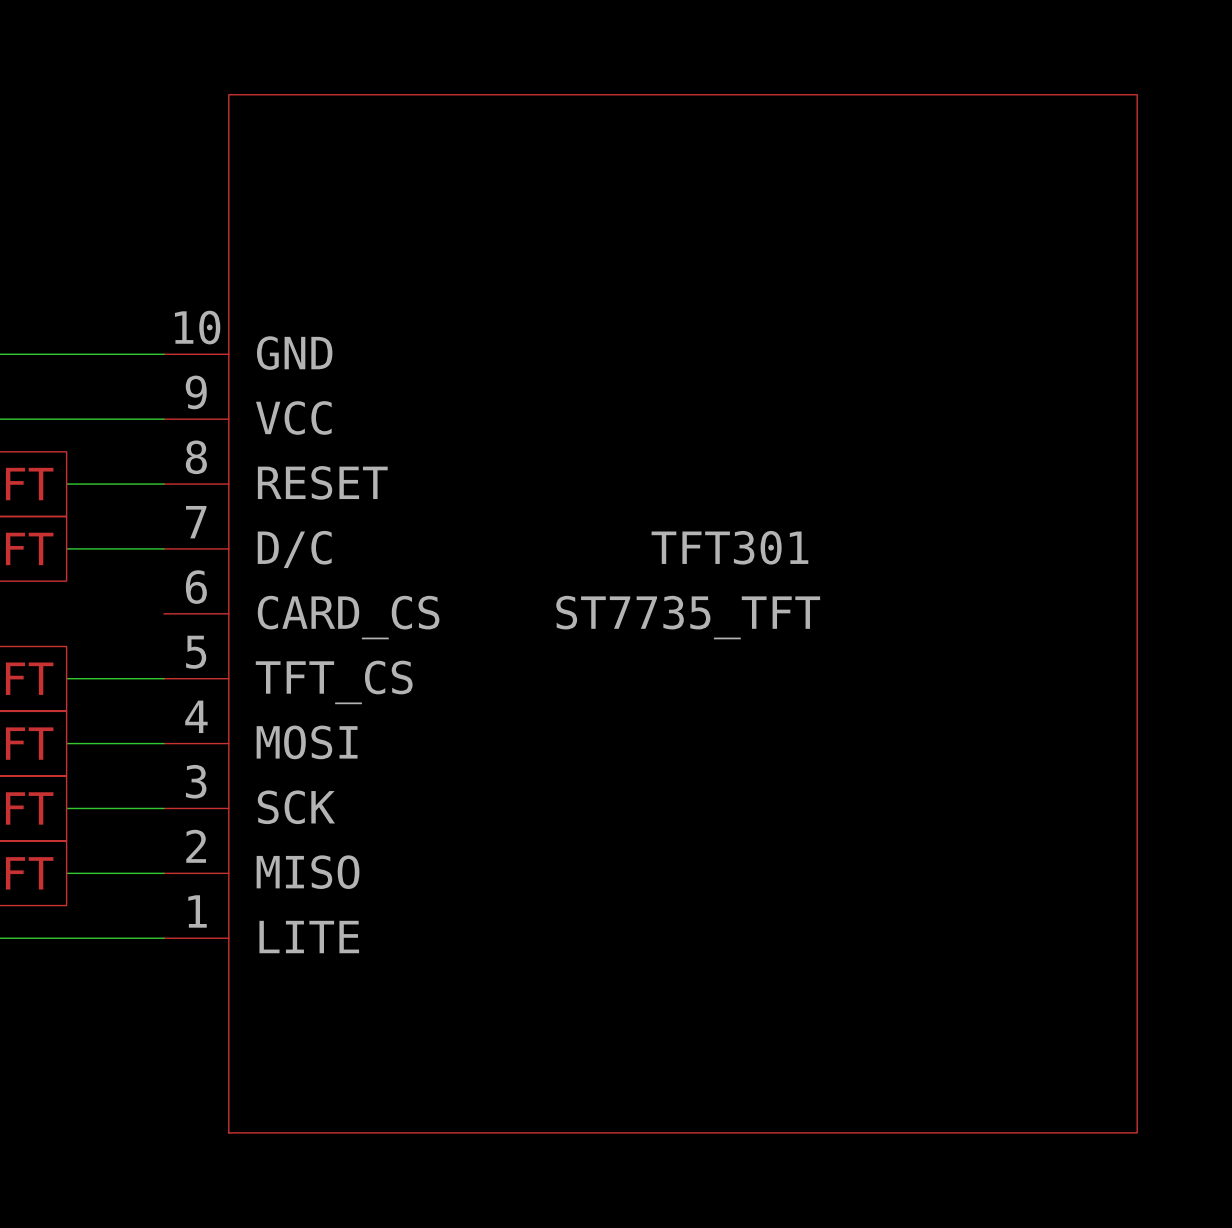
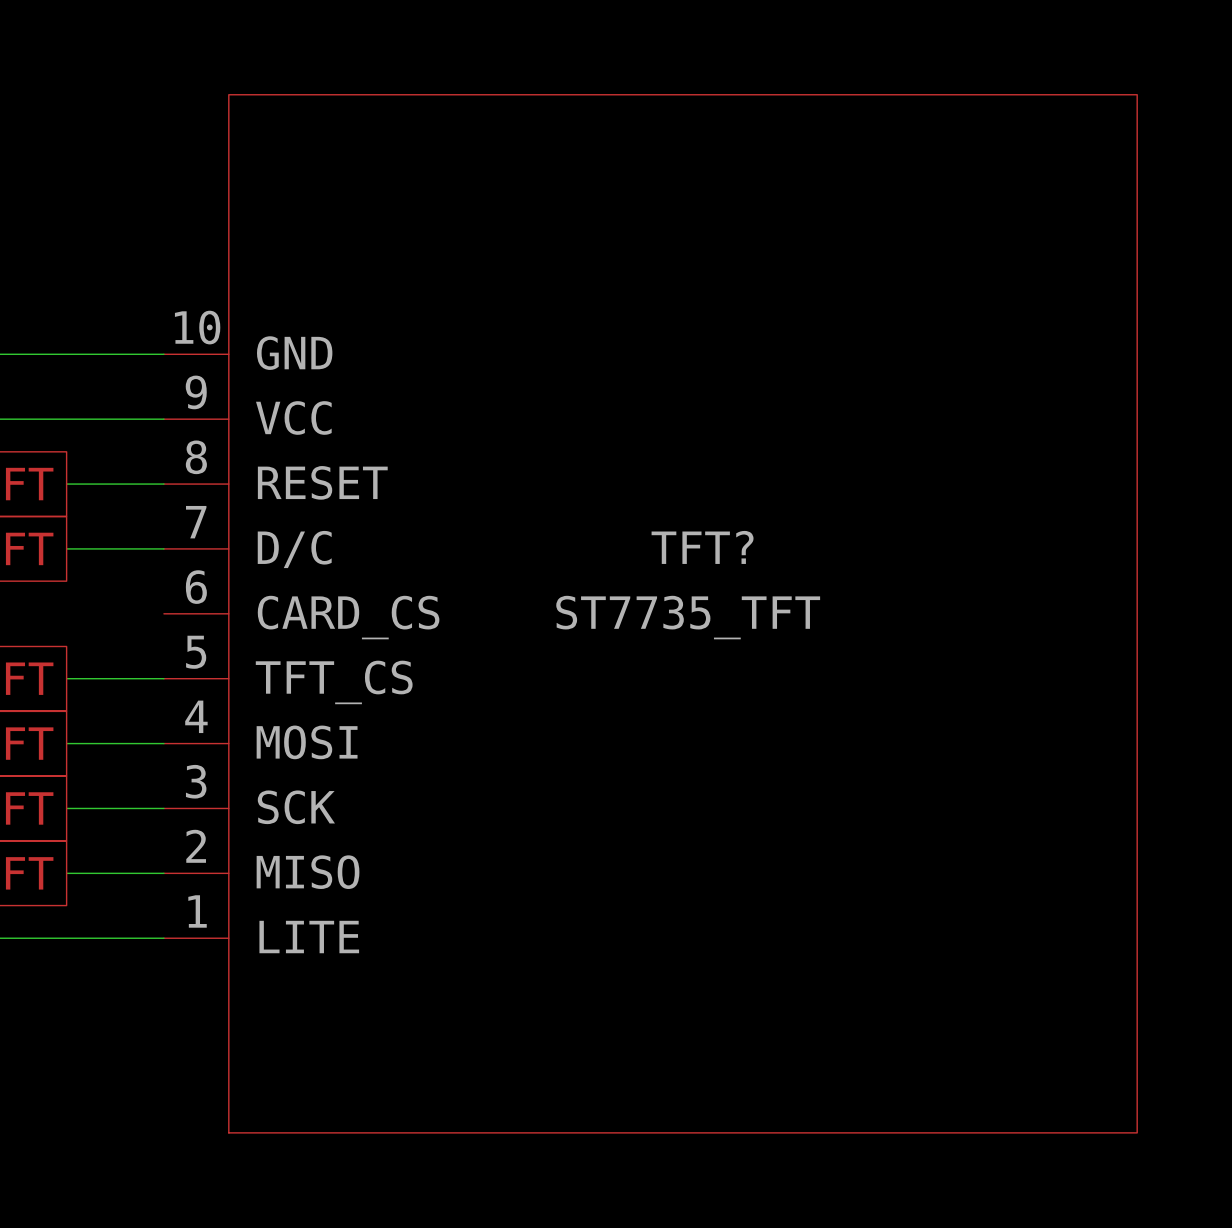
TFT301 name: TFT301 (729, 547) -> TFT? (702, 547)

